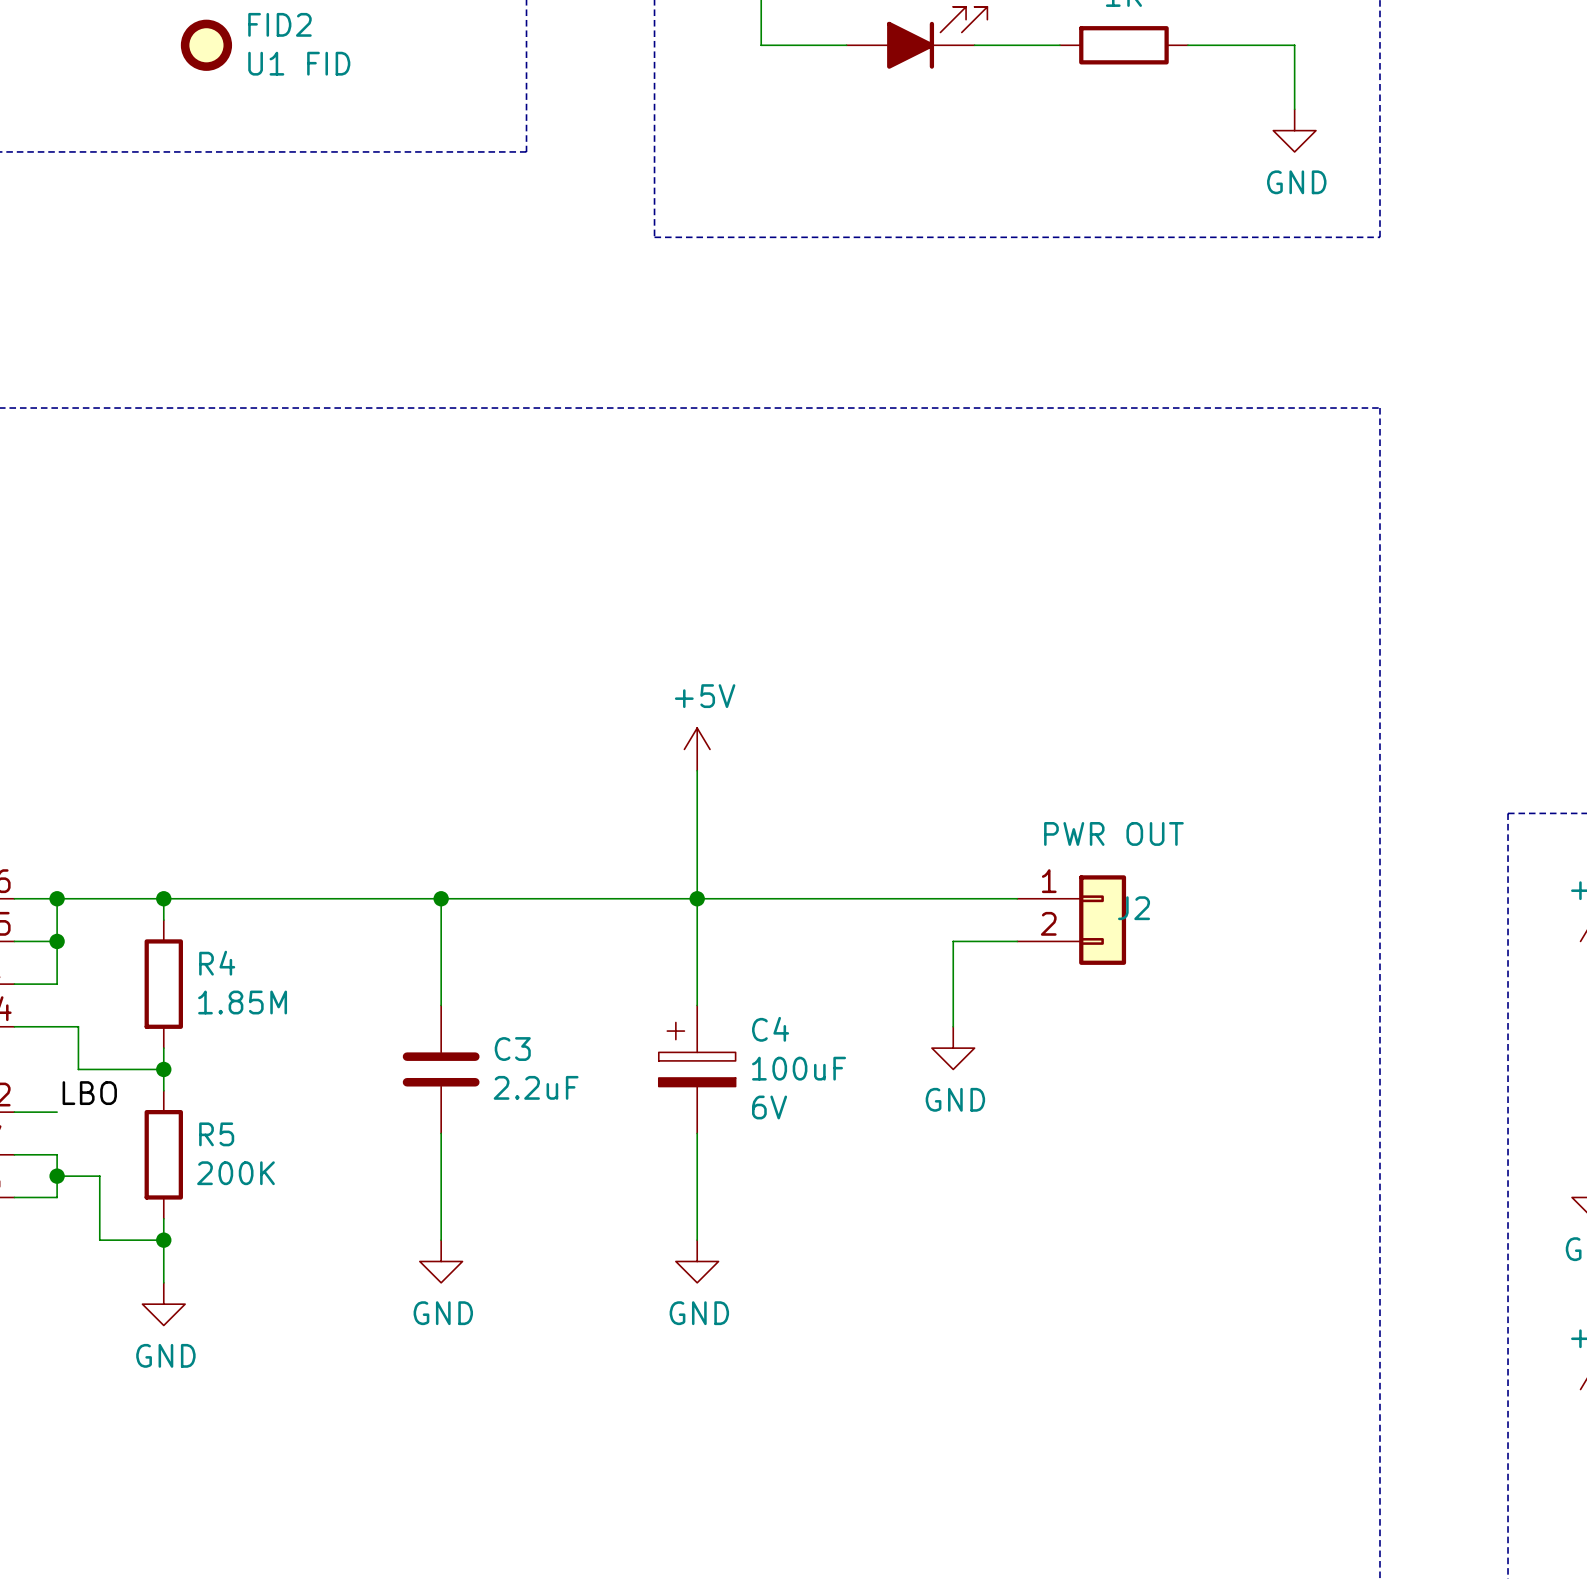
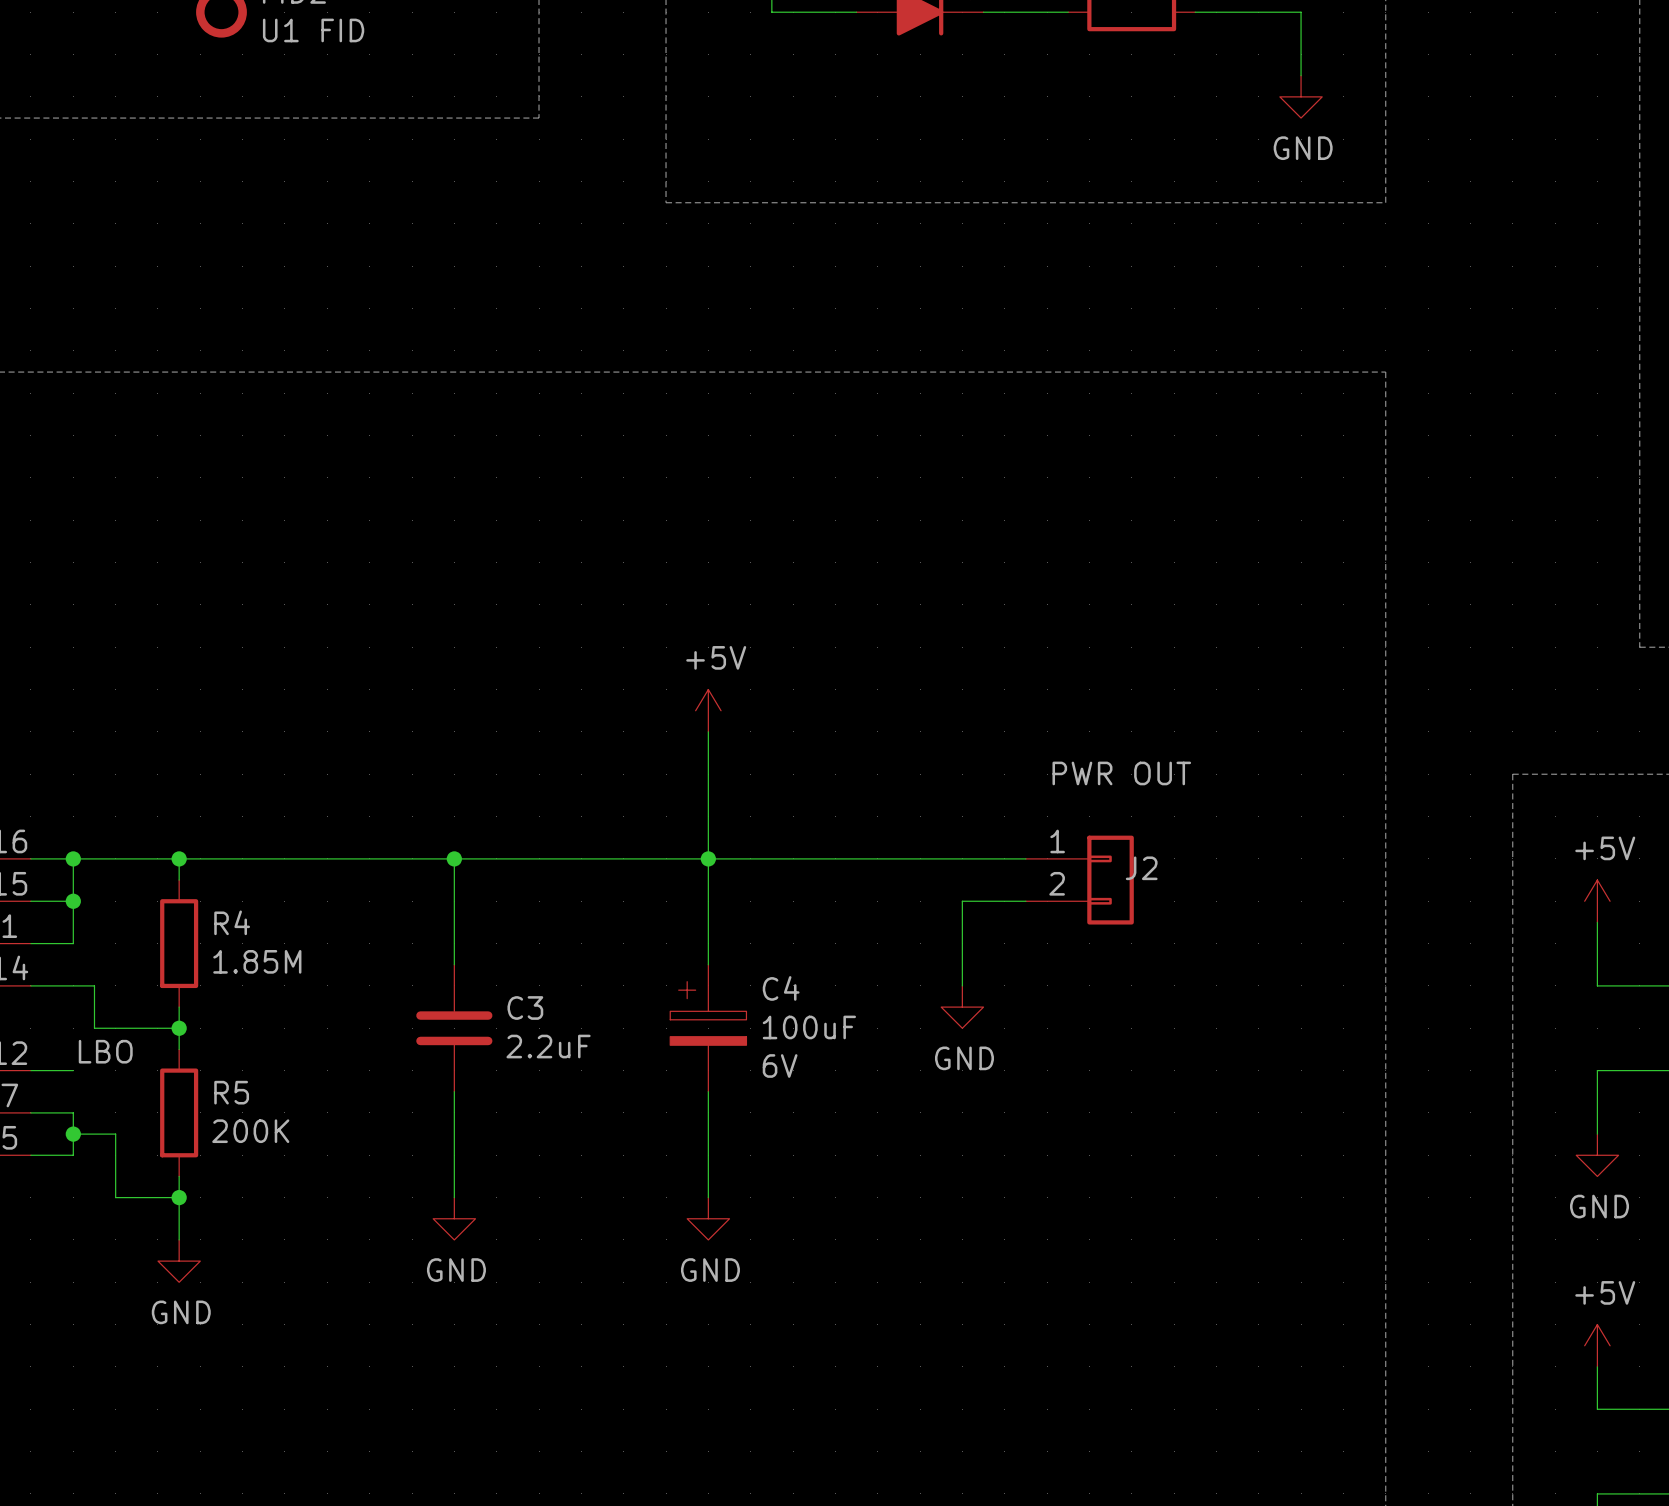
J2 value position: PWR OUT (1113, 833) -> PWR OUT (1121, 773)

